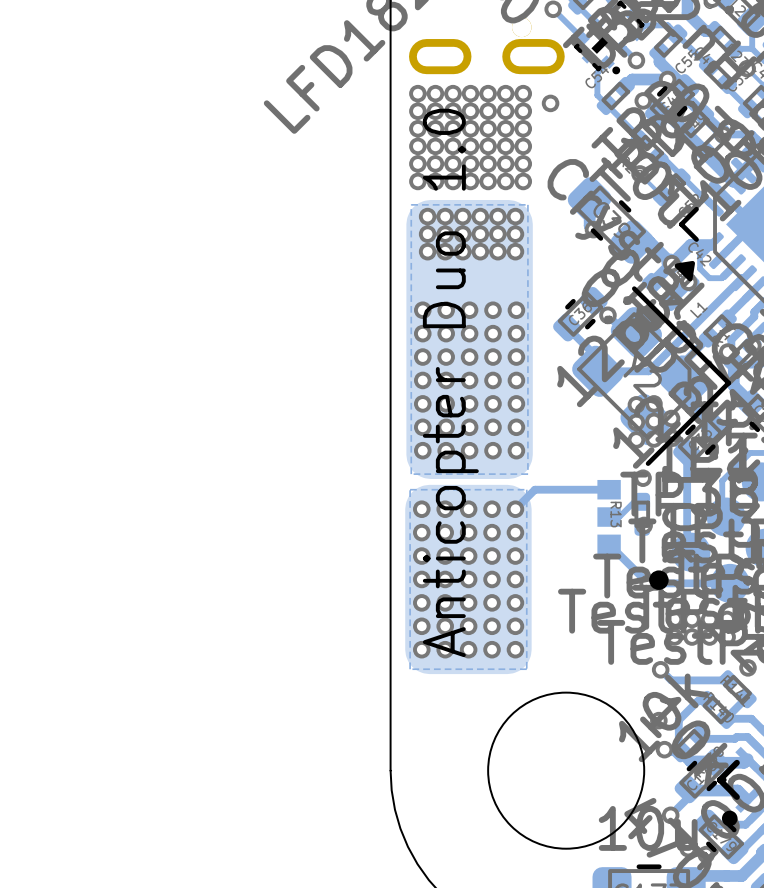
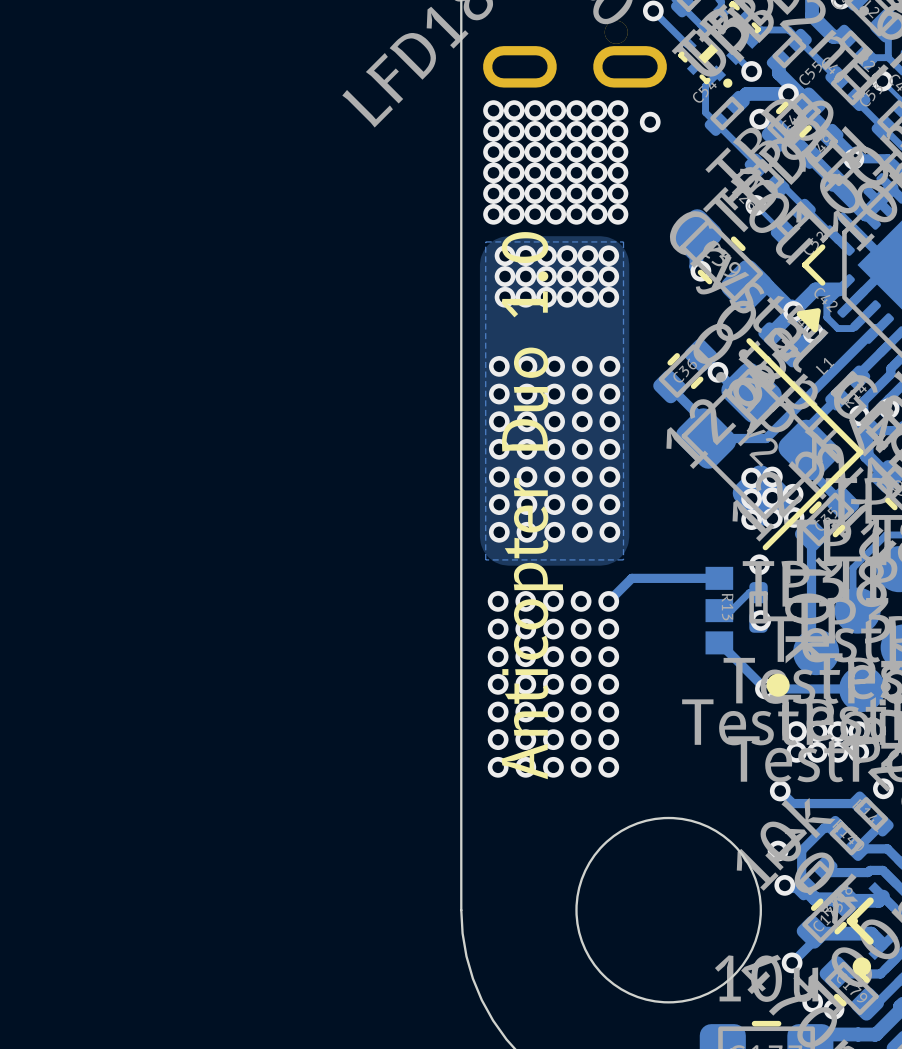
zone outline: (526, 489) (526, 669) (410, 669) (410, 489) (526, 489) -> none

